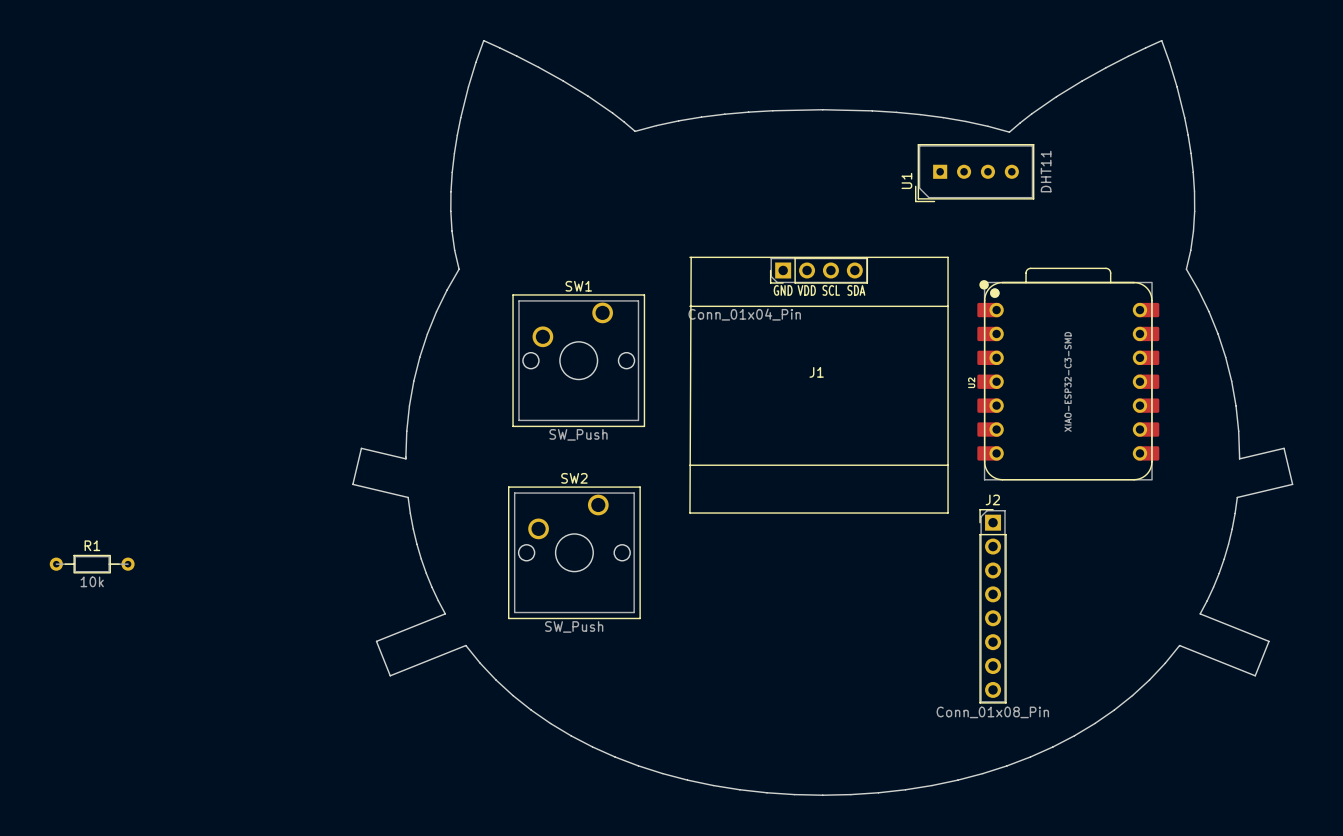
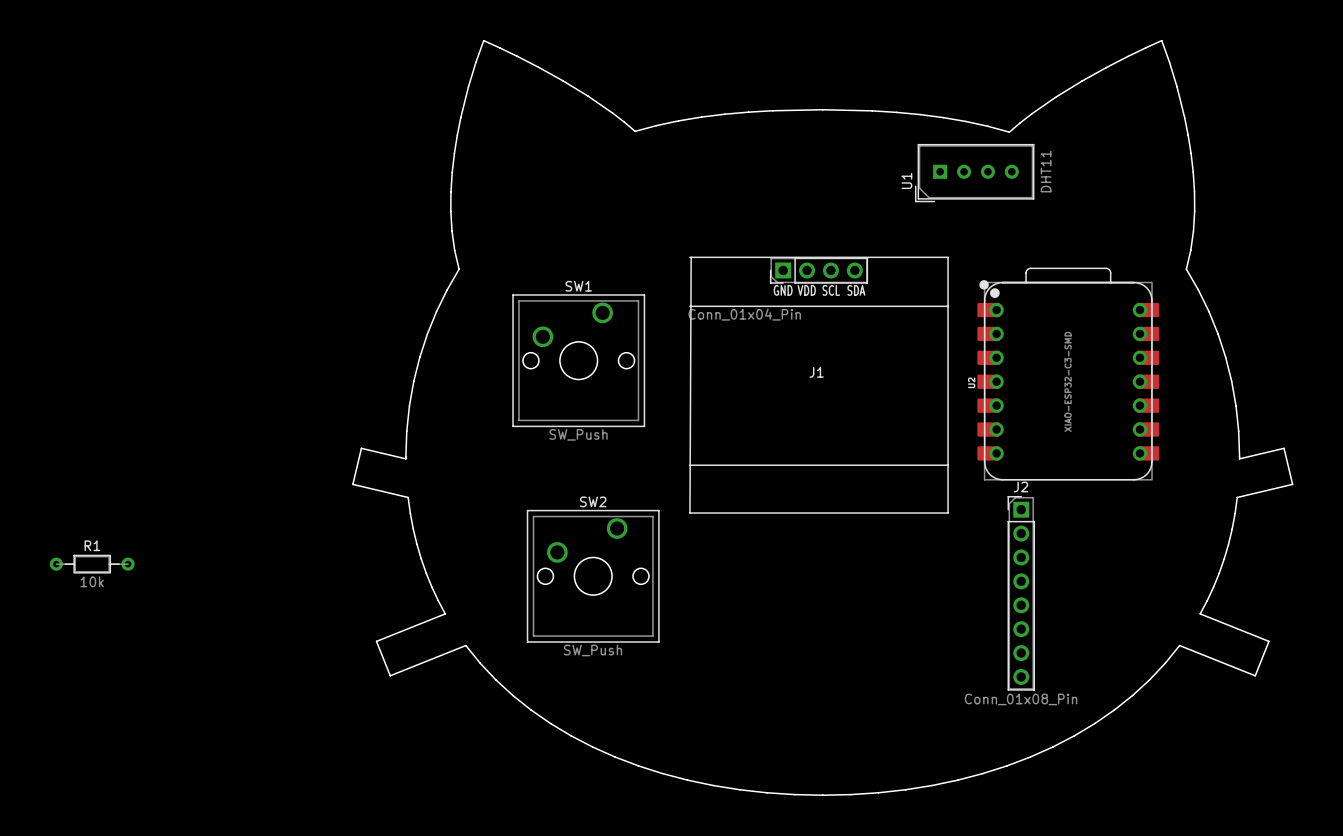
SW2 position: (574, 552) -> (593, 576)
J2 position: (993, 606) -> (1021, 593)

